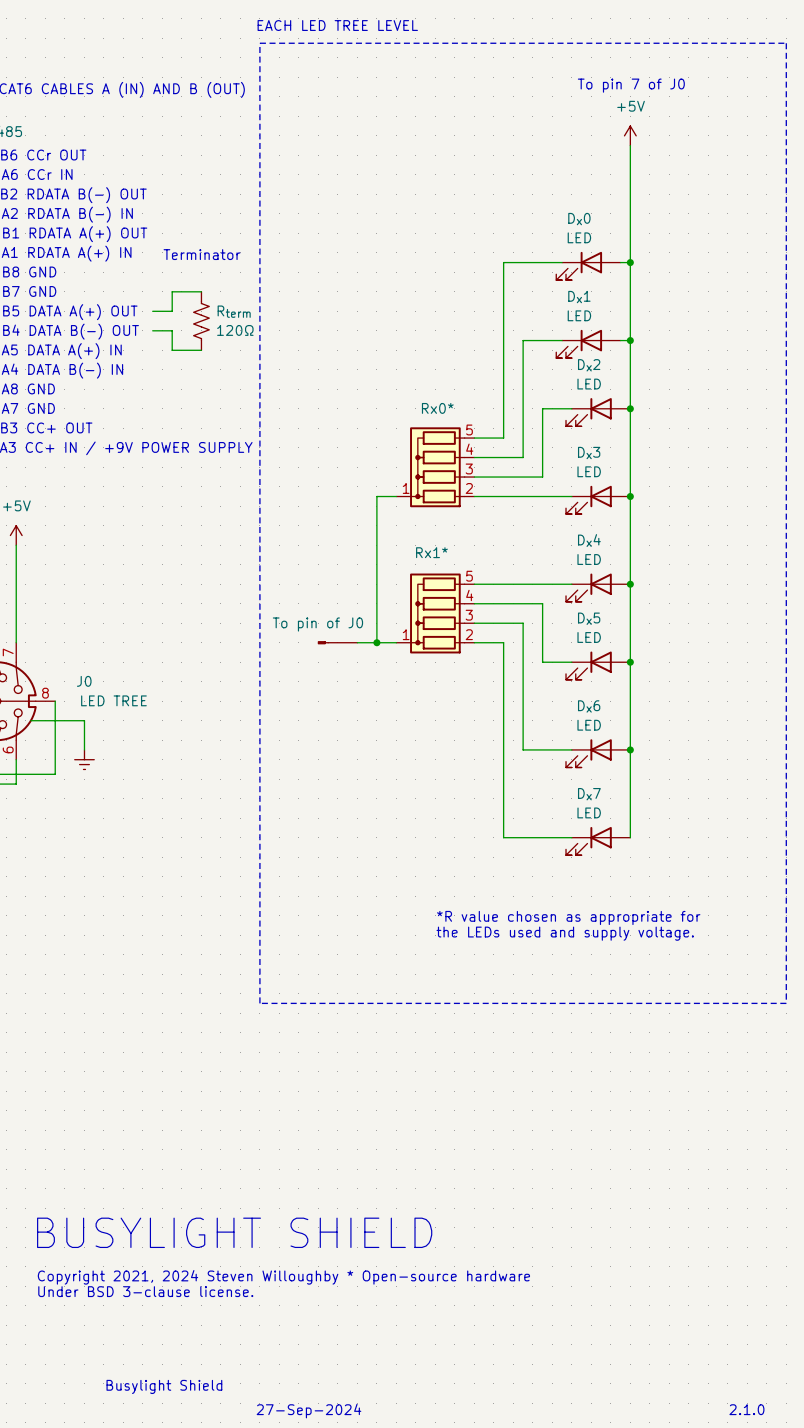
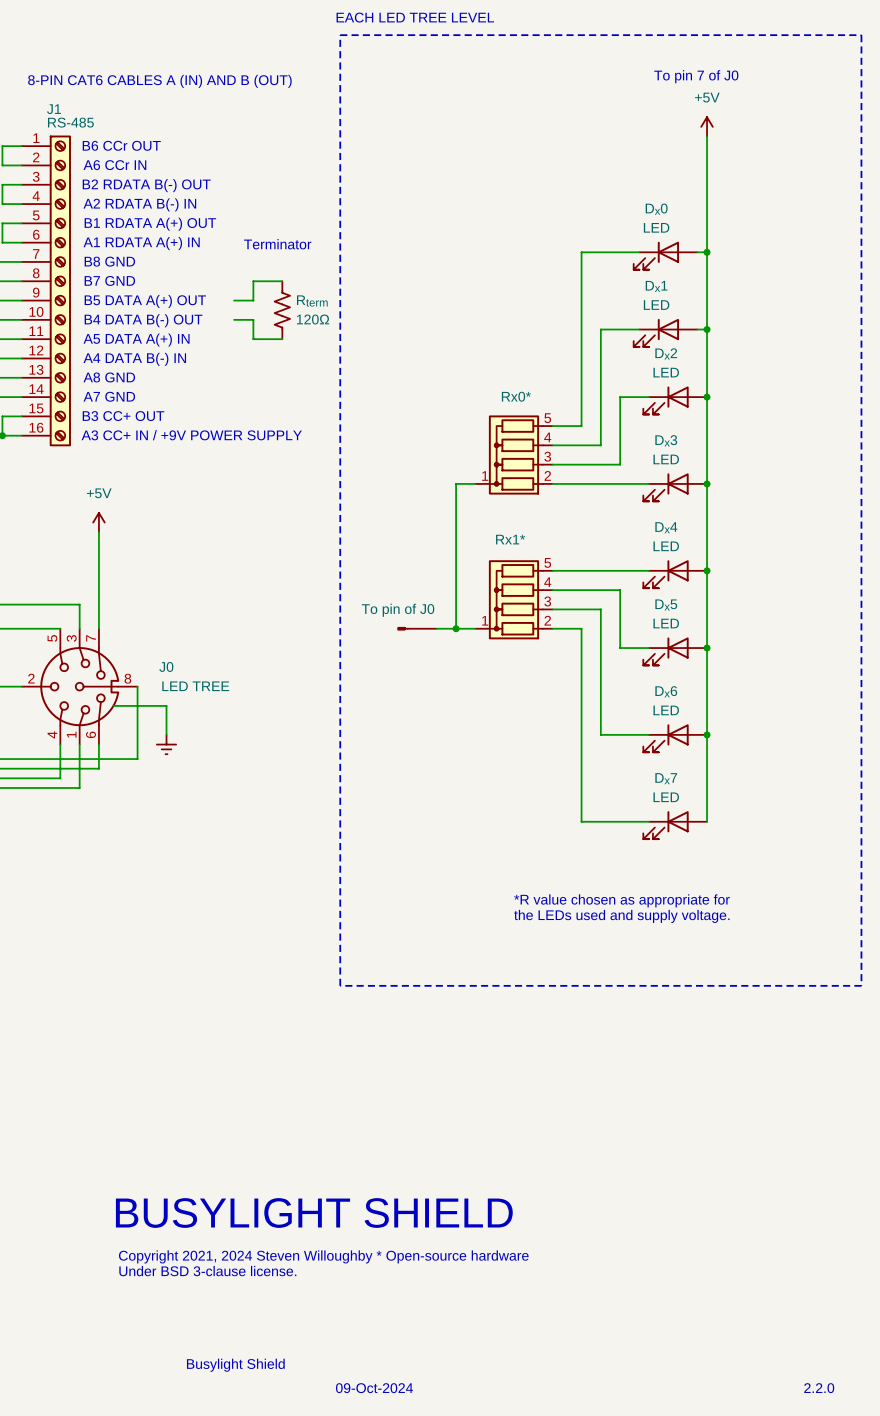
text: 2.1.0 (746, 1409) -> 2.2.0 (819, 1388)
text: 27-Sep-2024 (308, 1411) -> 09-Oct-2024 (374, 1388)

